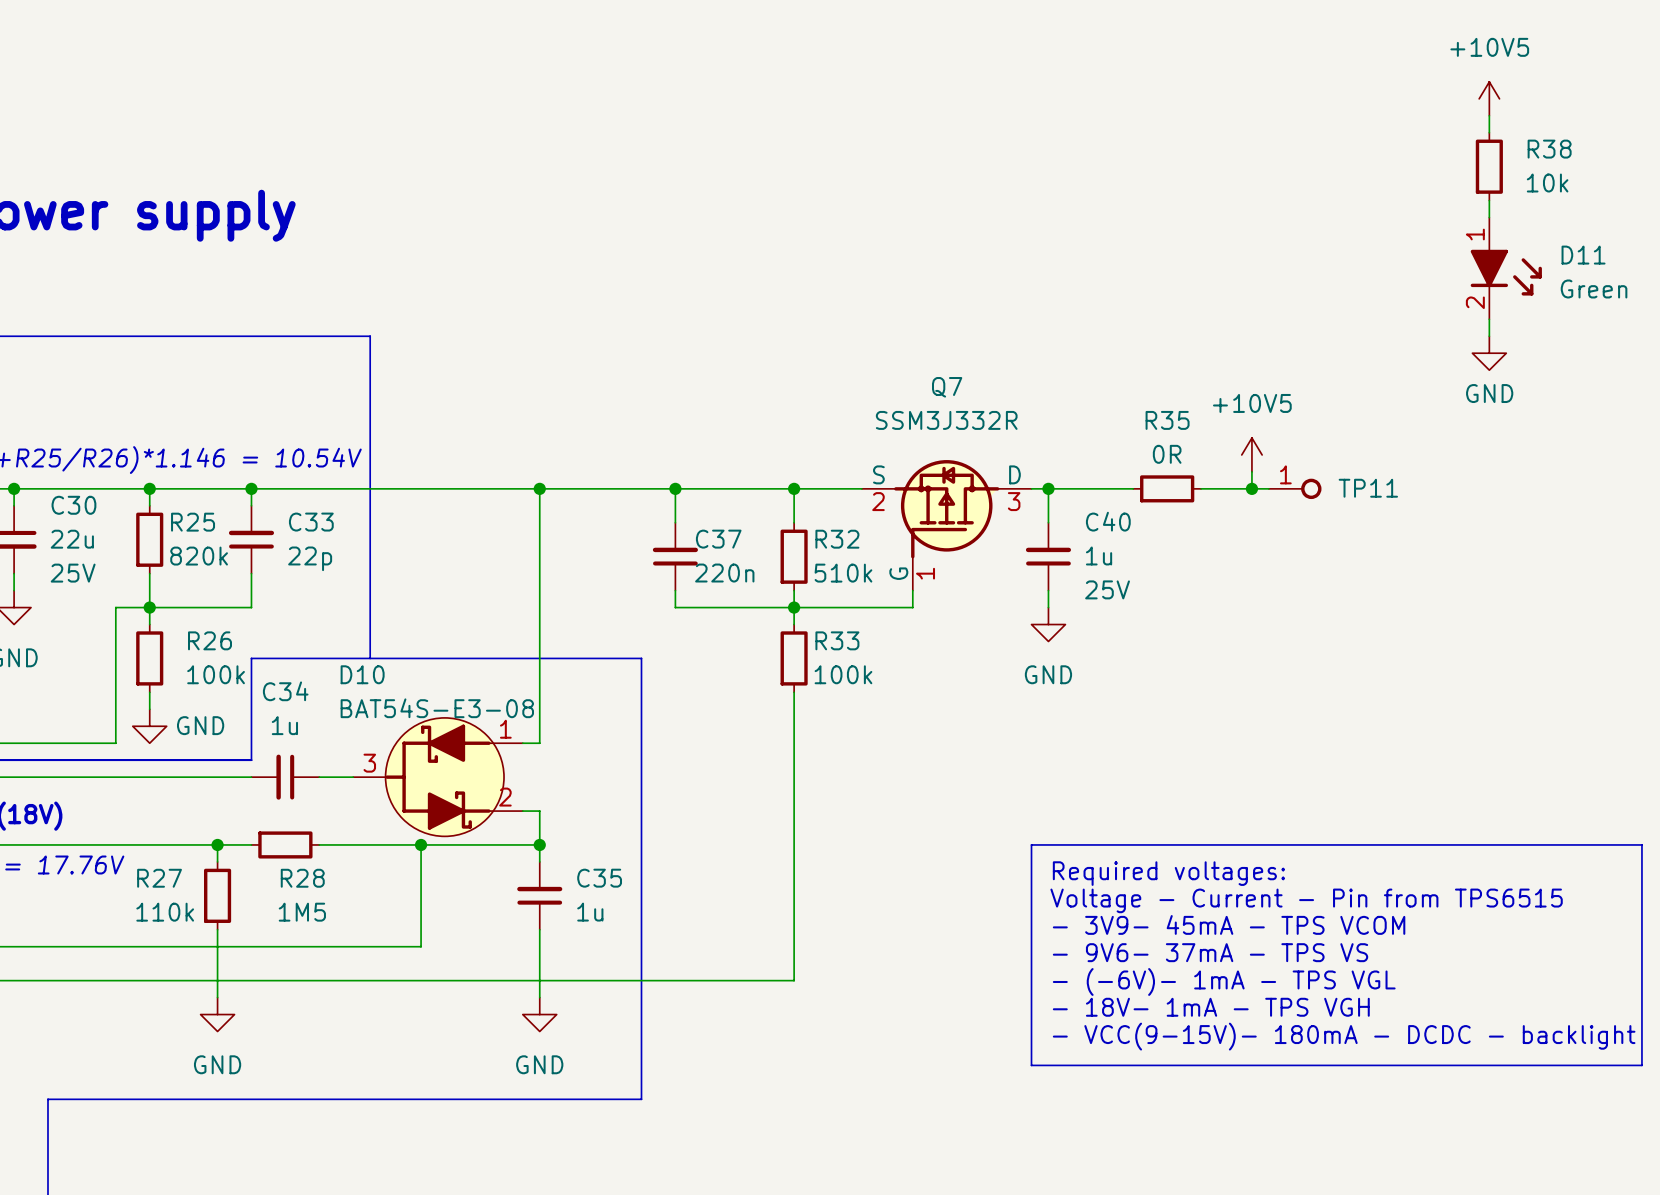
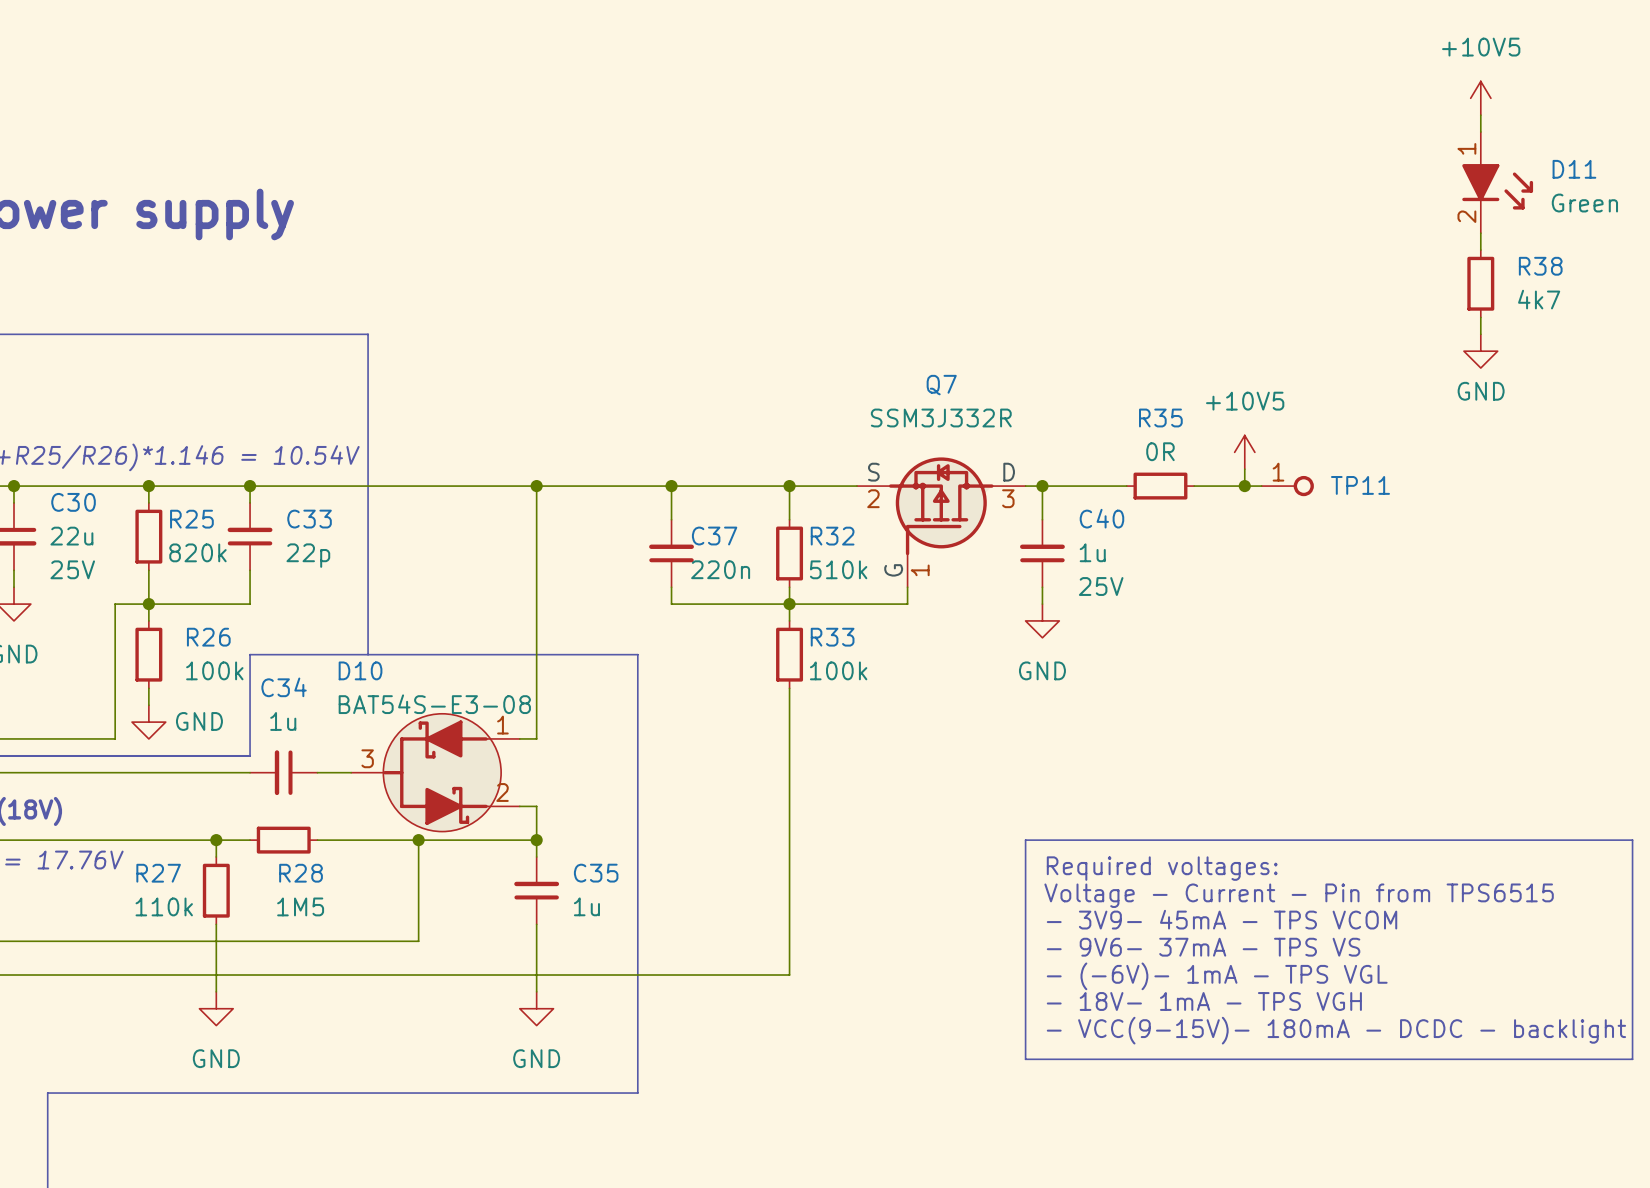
R38 position: (1489, 166) -> (1480, 283)
R38 text: 10k (1547, 183) -> 4k7 (1539, 299)
D11 position: (1506, 268) -> (1497, 182)

